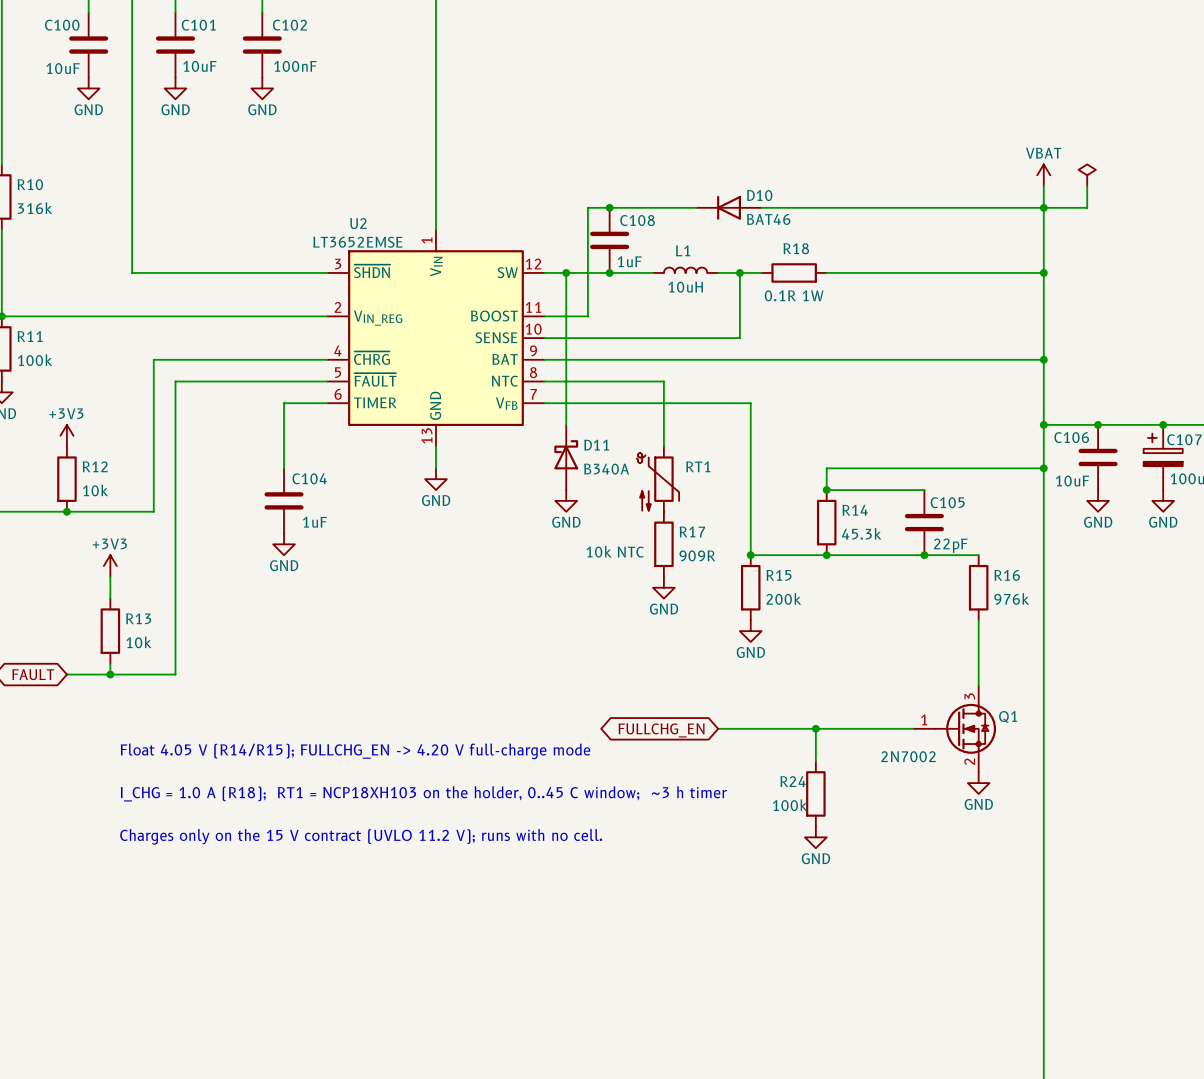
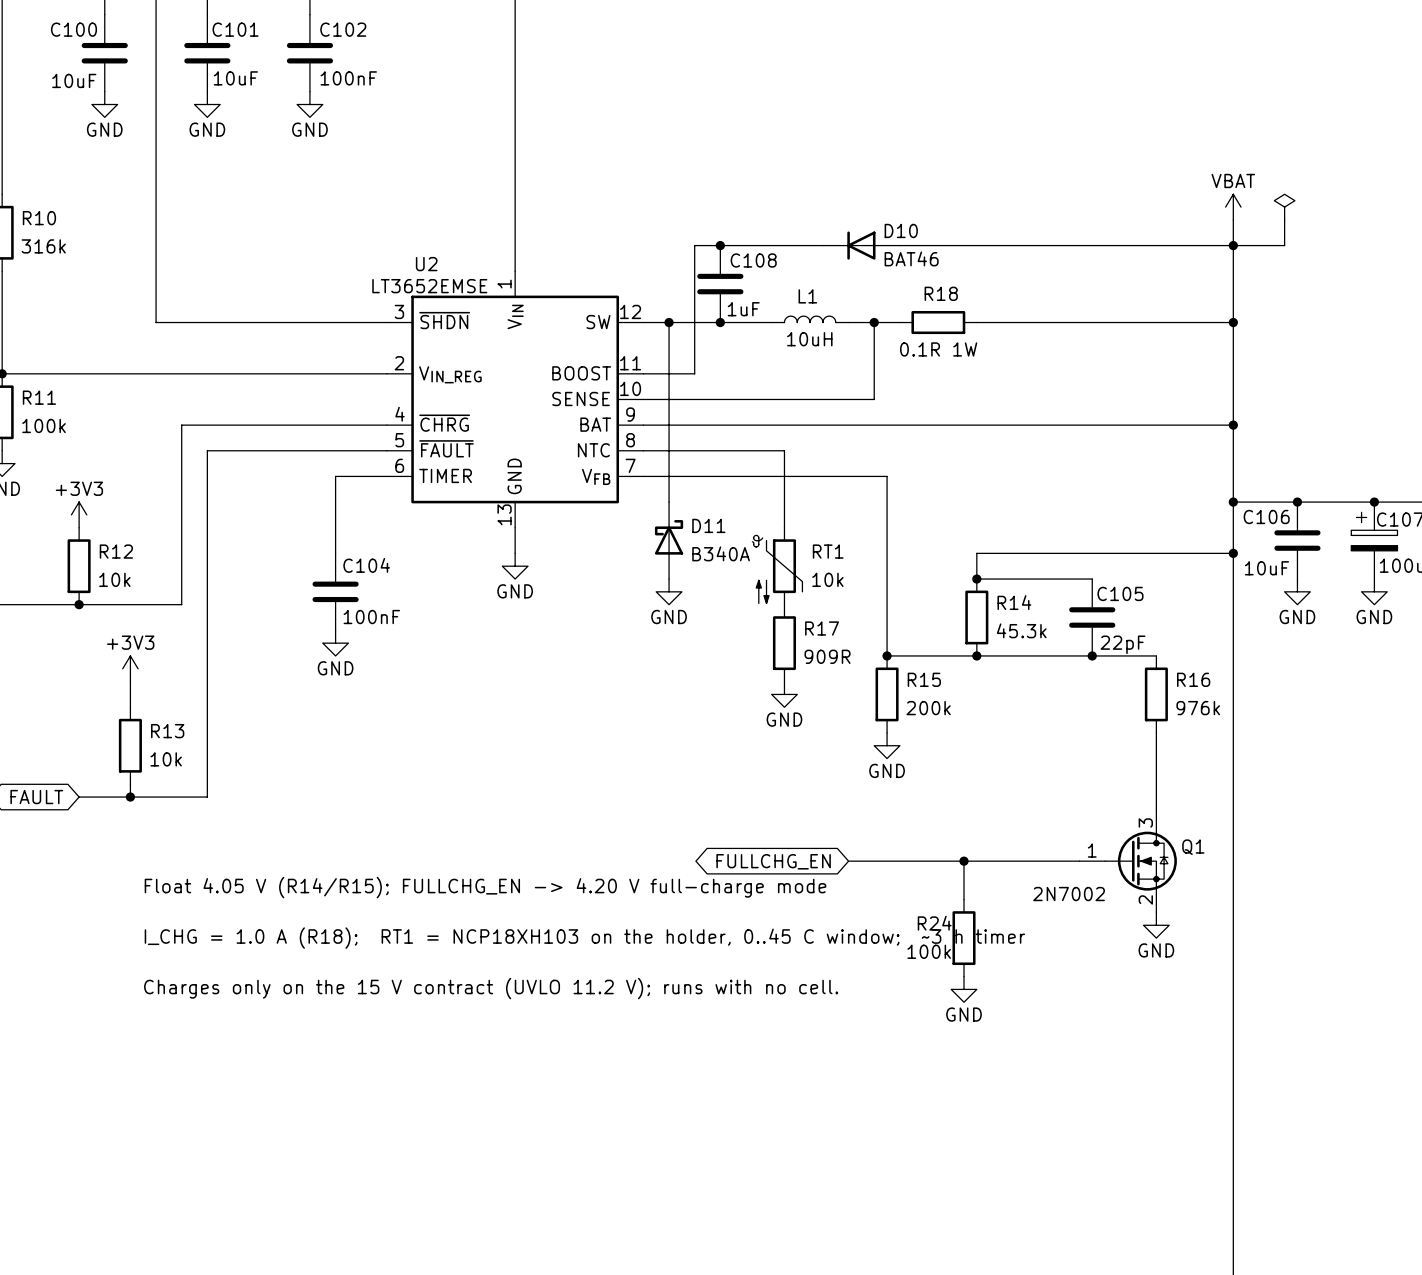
C104 value: 1uF (314, 522) -> 100nF (371, 617)
RT1 value: 10k NTC (615, 551) -> 10k (827, 579)

